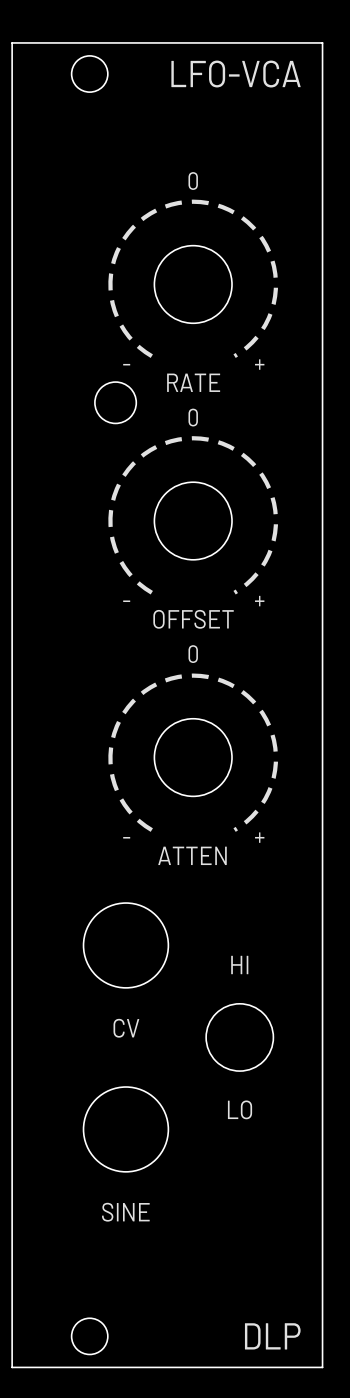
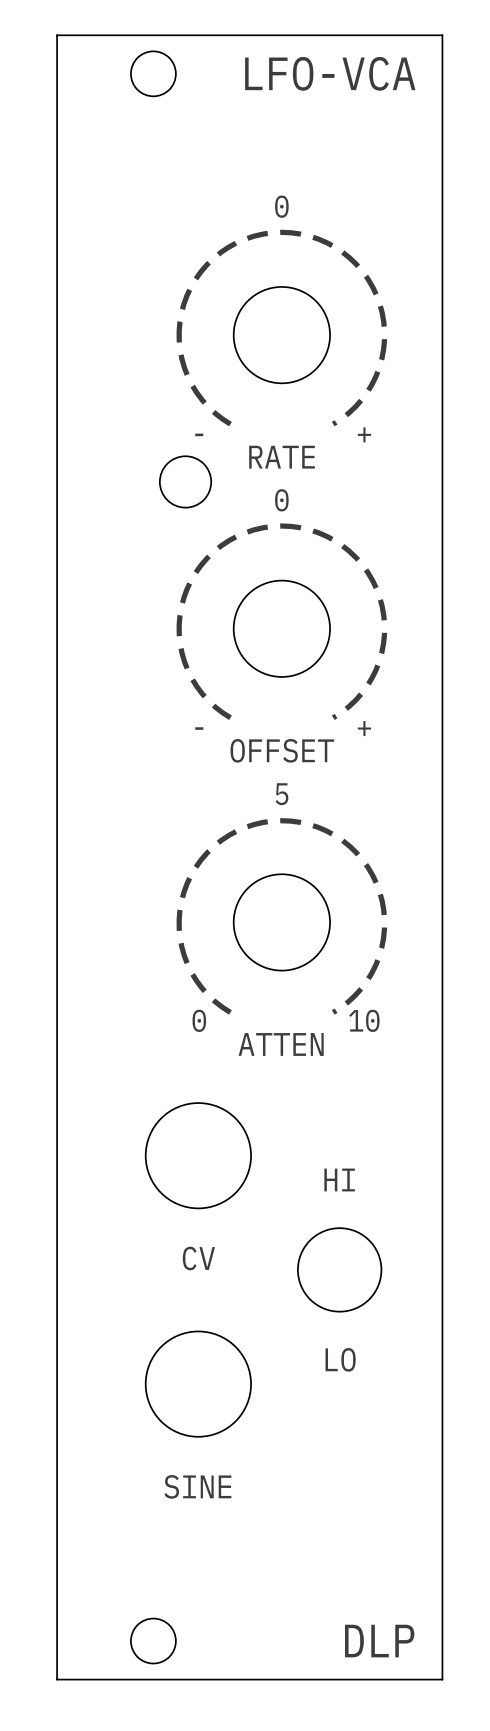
text: 0 (193, 654) -> 5 (281, 794)
text: - (126, 837) -> 0 (199, 1020)
text: + (259, 837) -> 10 (364, 1020)

